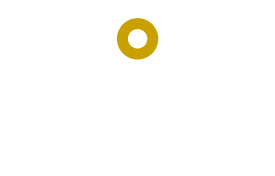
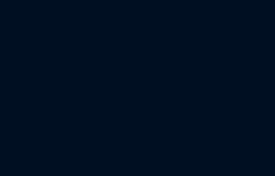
part: (137, 38) -> none

